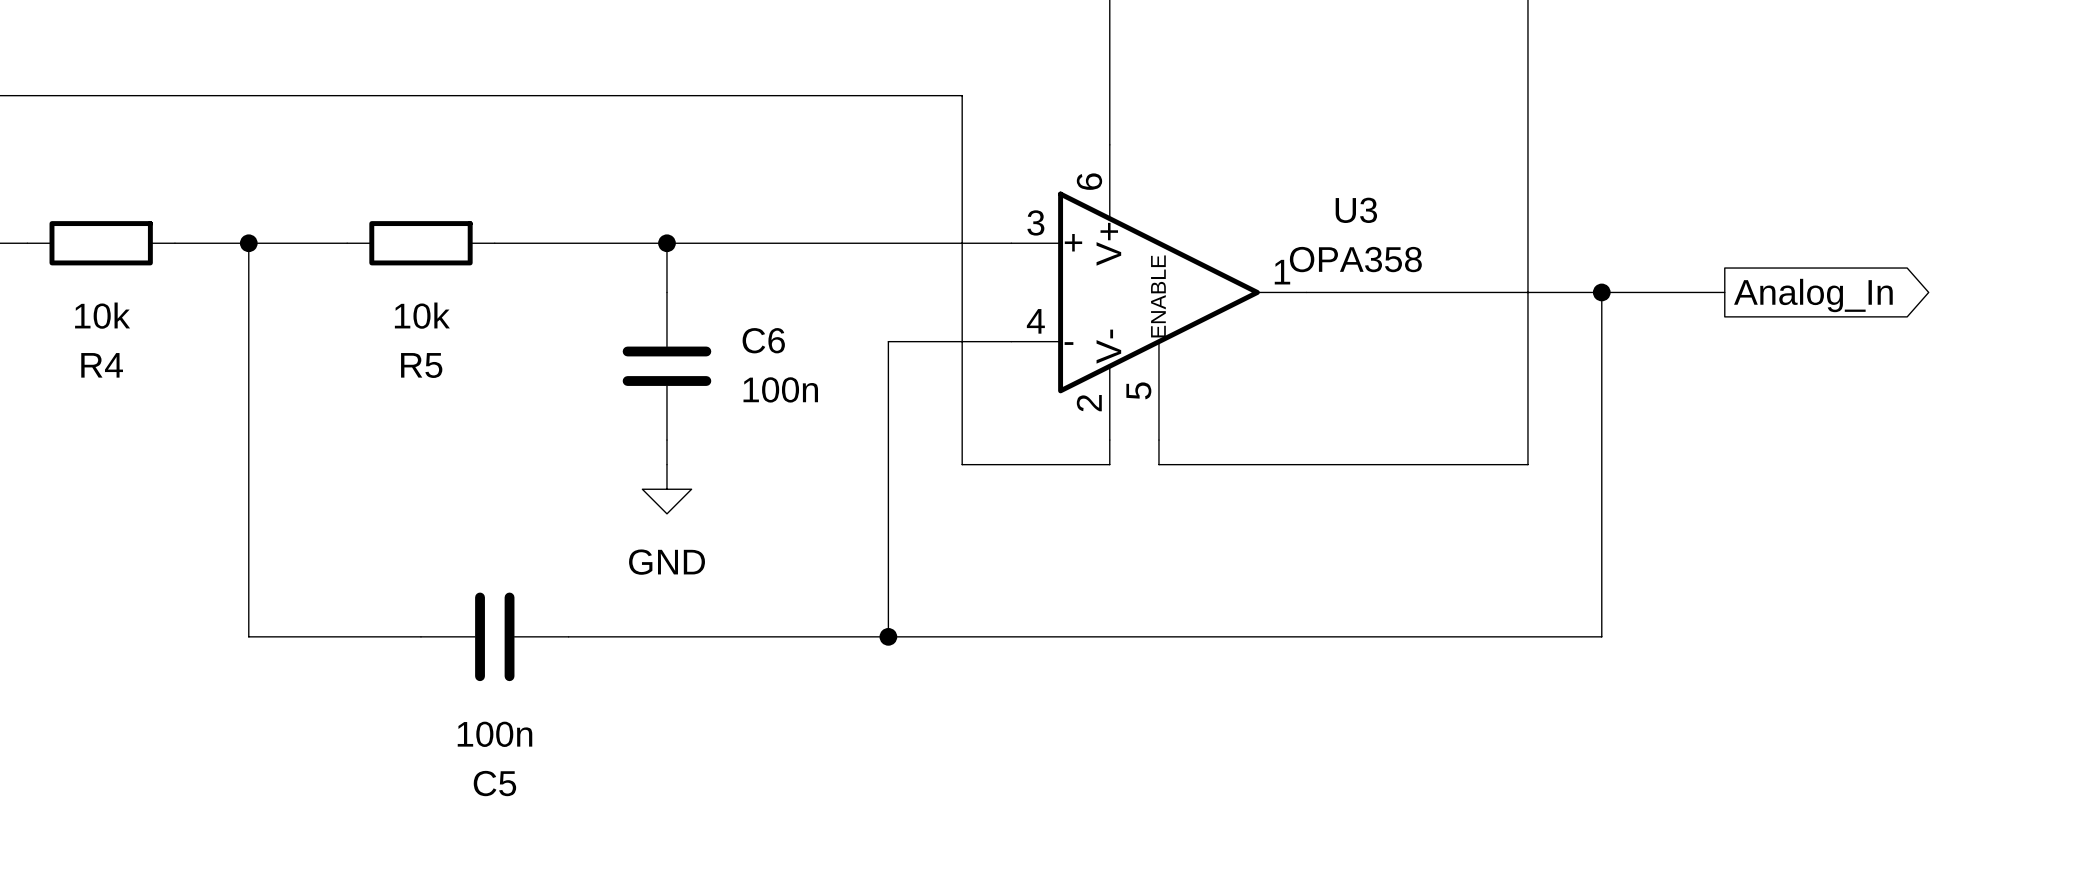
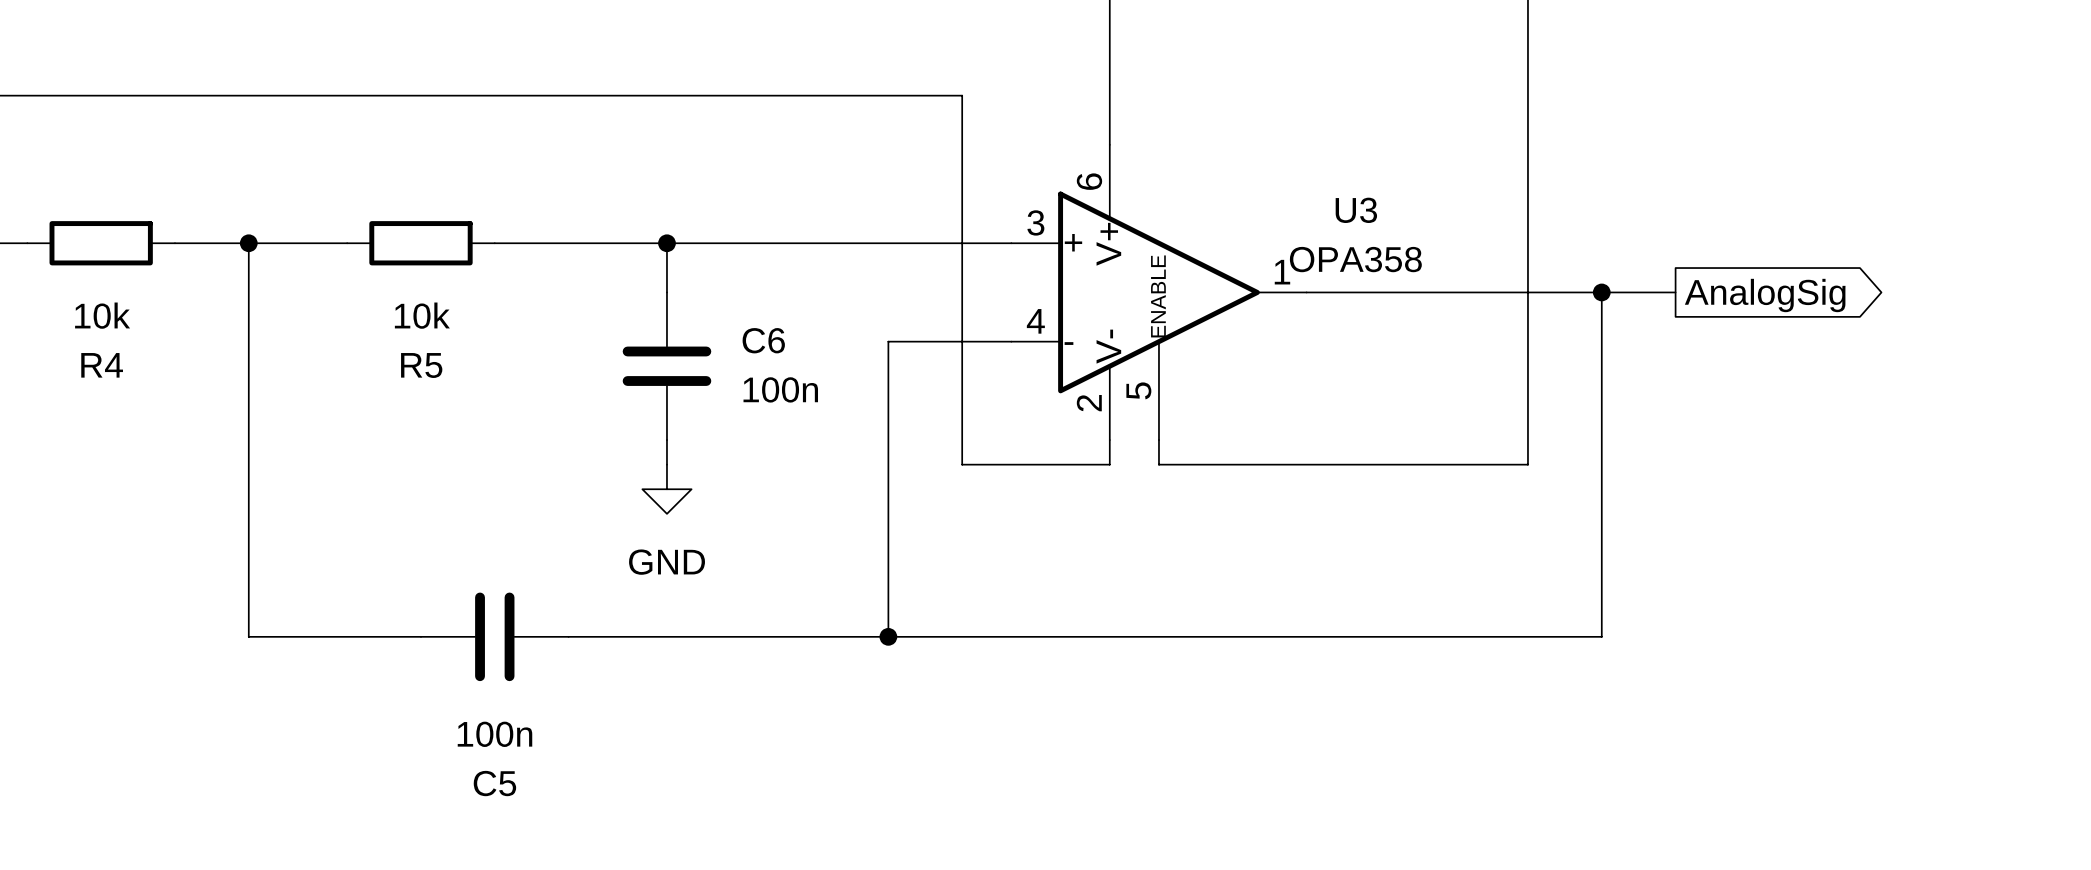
wire: (1675, 292) (1724, 292) -> none
global label: Analog_In (1813, 295) -> AnalogSig (1765, 295)

